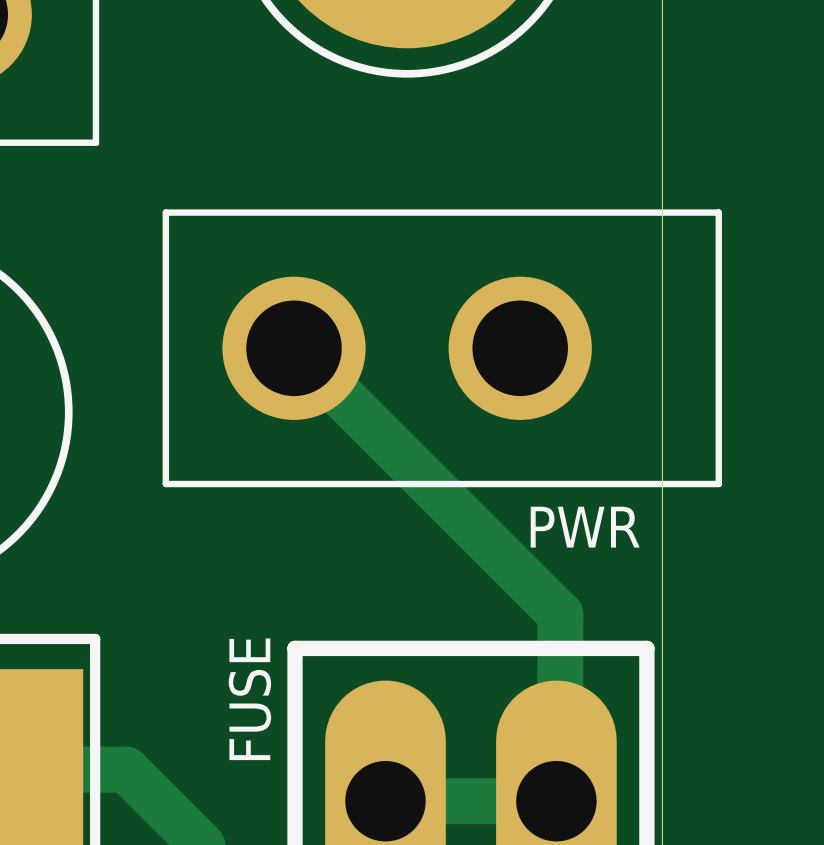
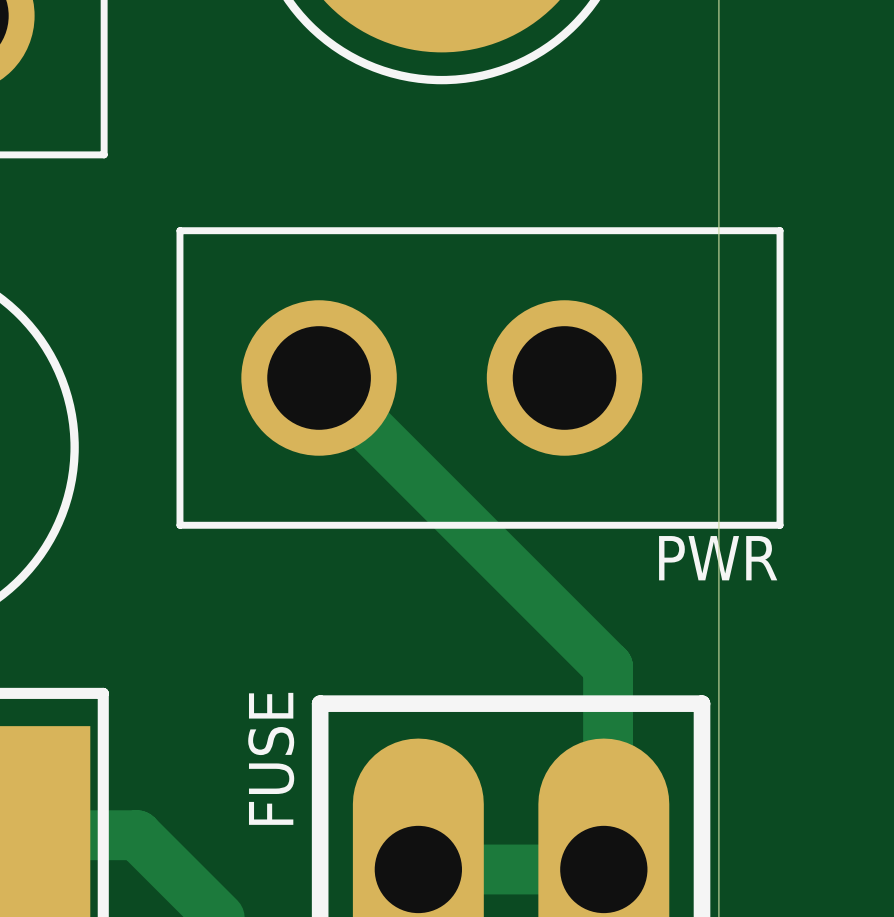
PWR name position: PWR (585, 527) -> PWR (718, 558)

